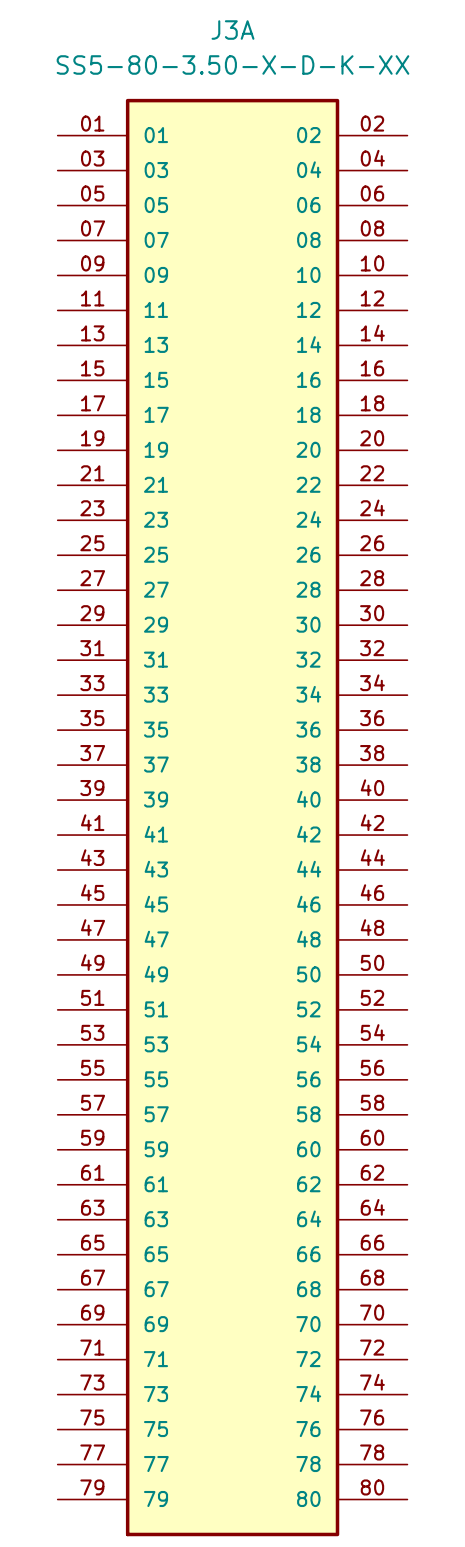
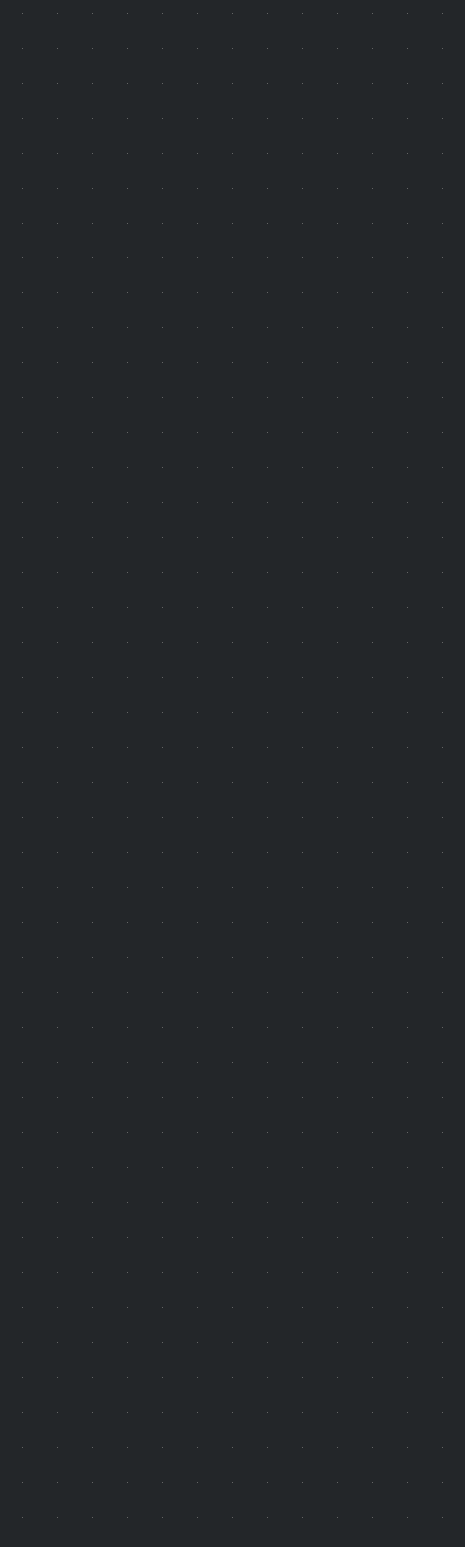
J3A: SS5-80-3.50-X-D-K-XX (232, 817) -> none

